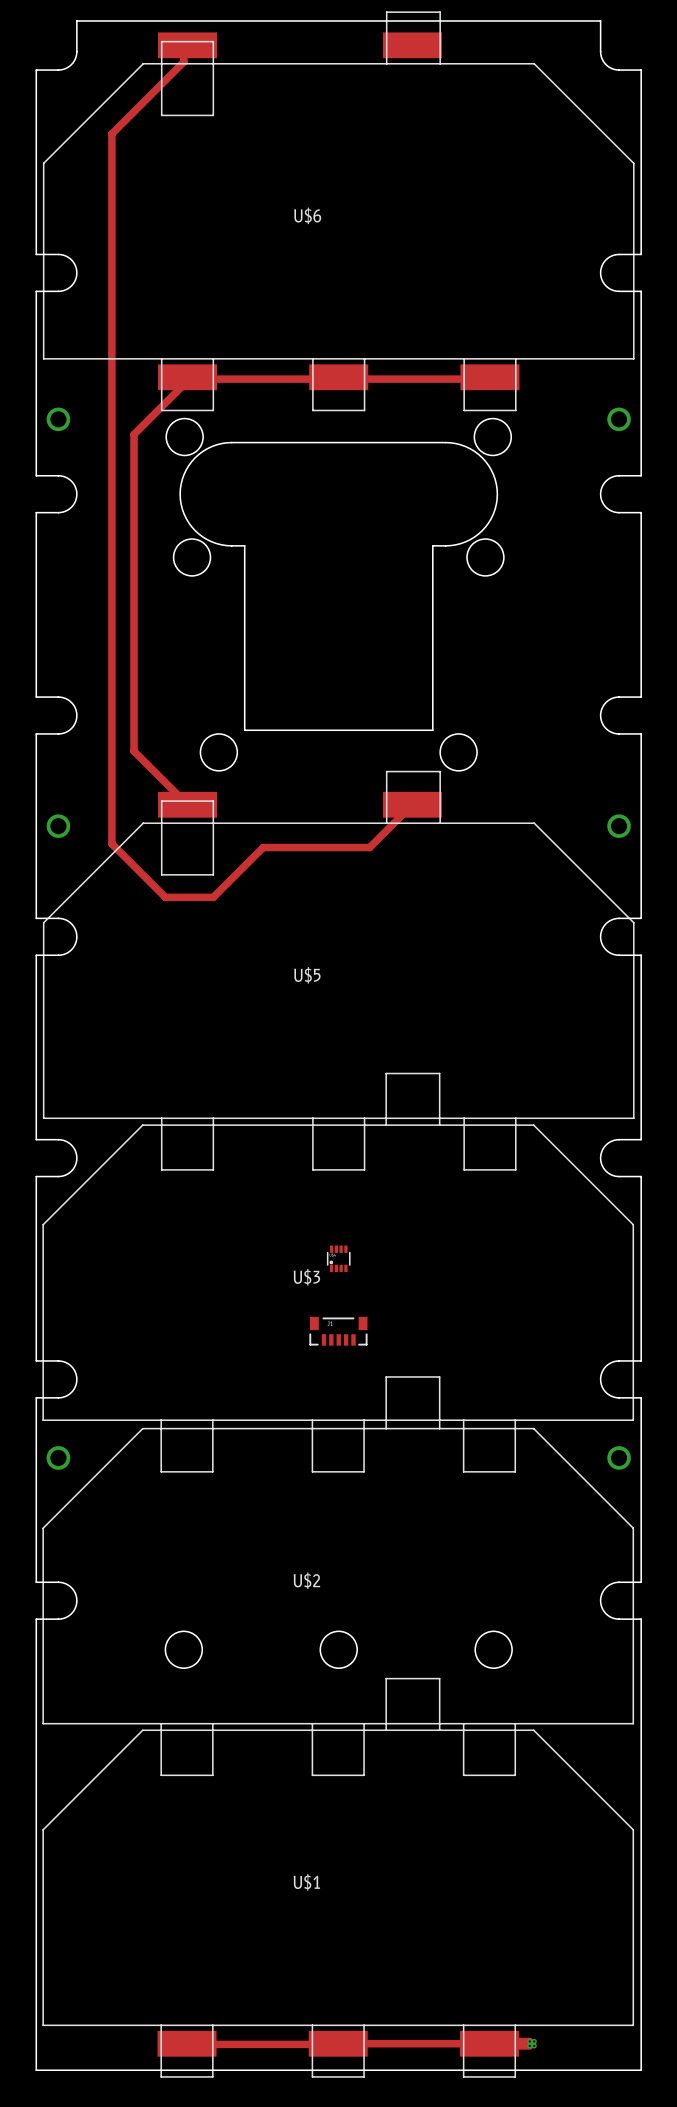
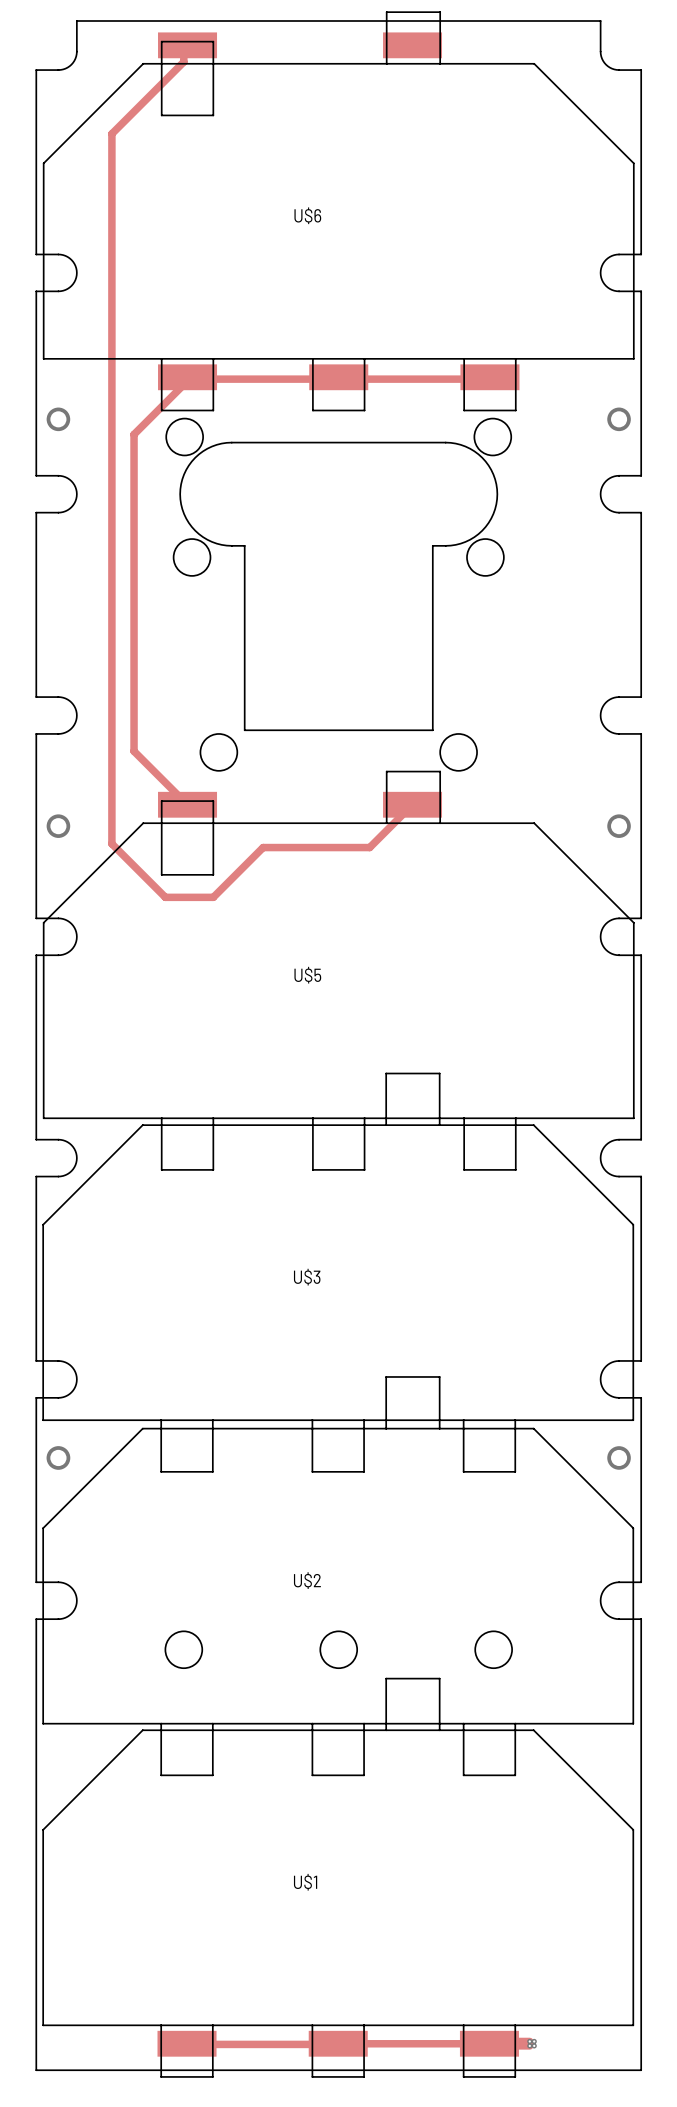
part: (338, 1258) -> none
part: (339, 1334) -> none

